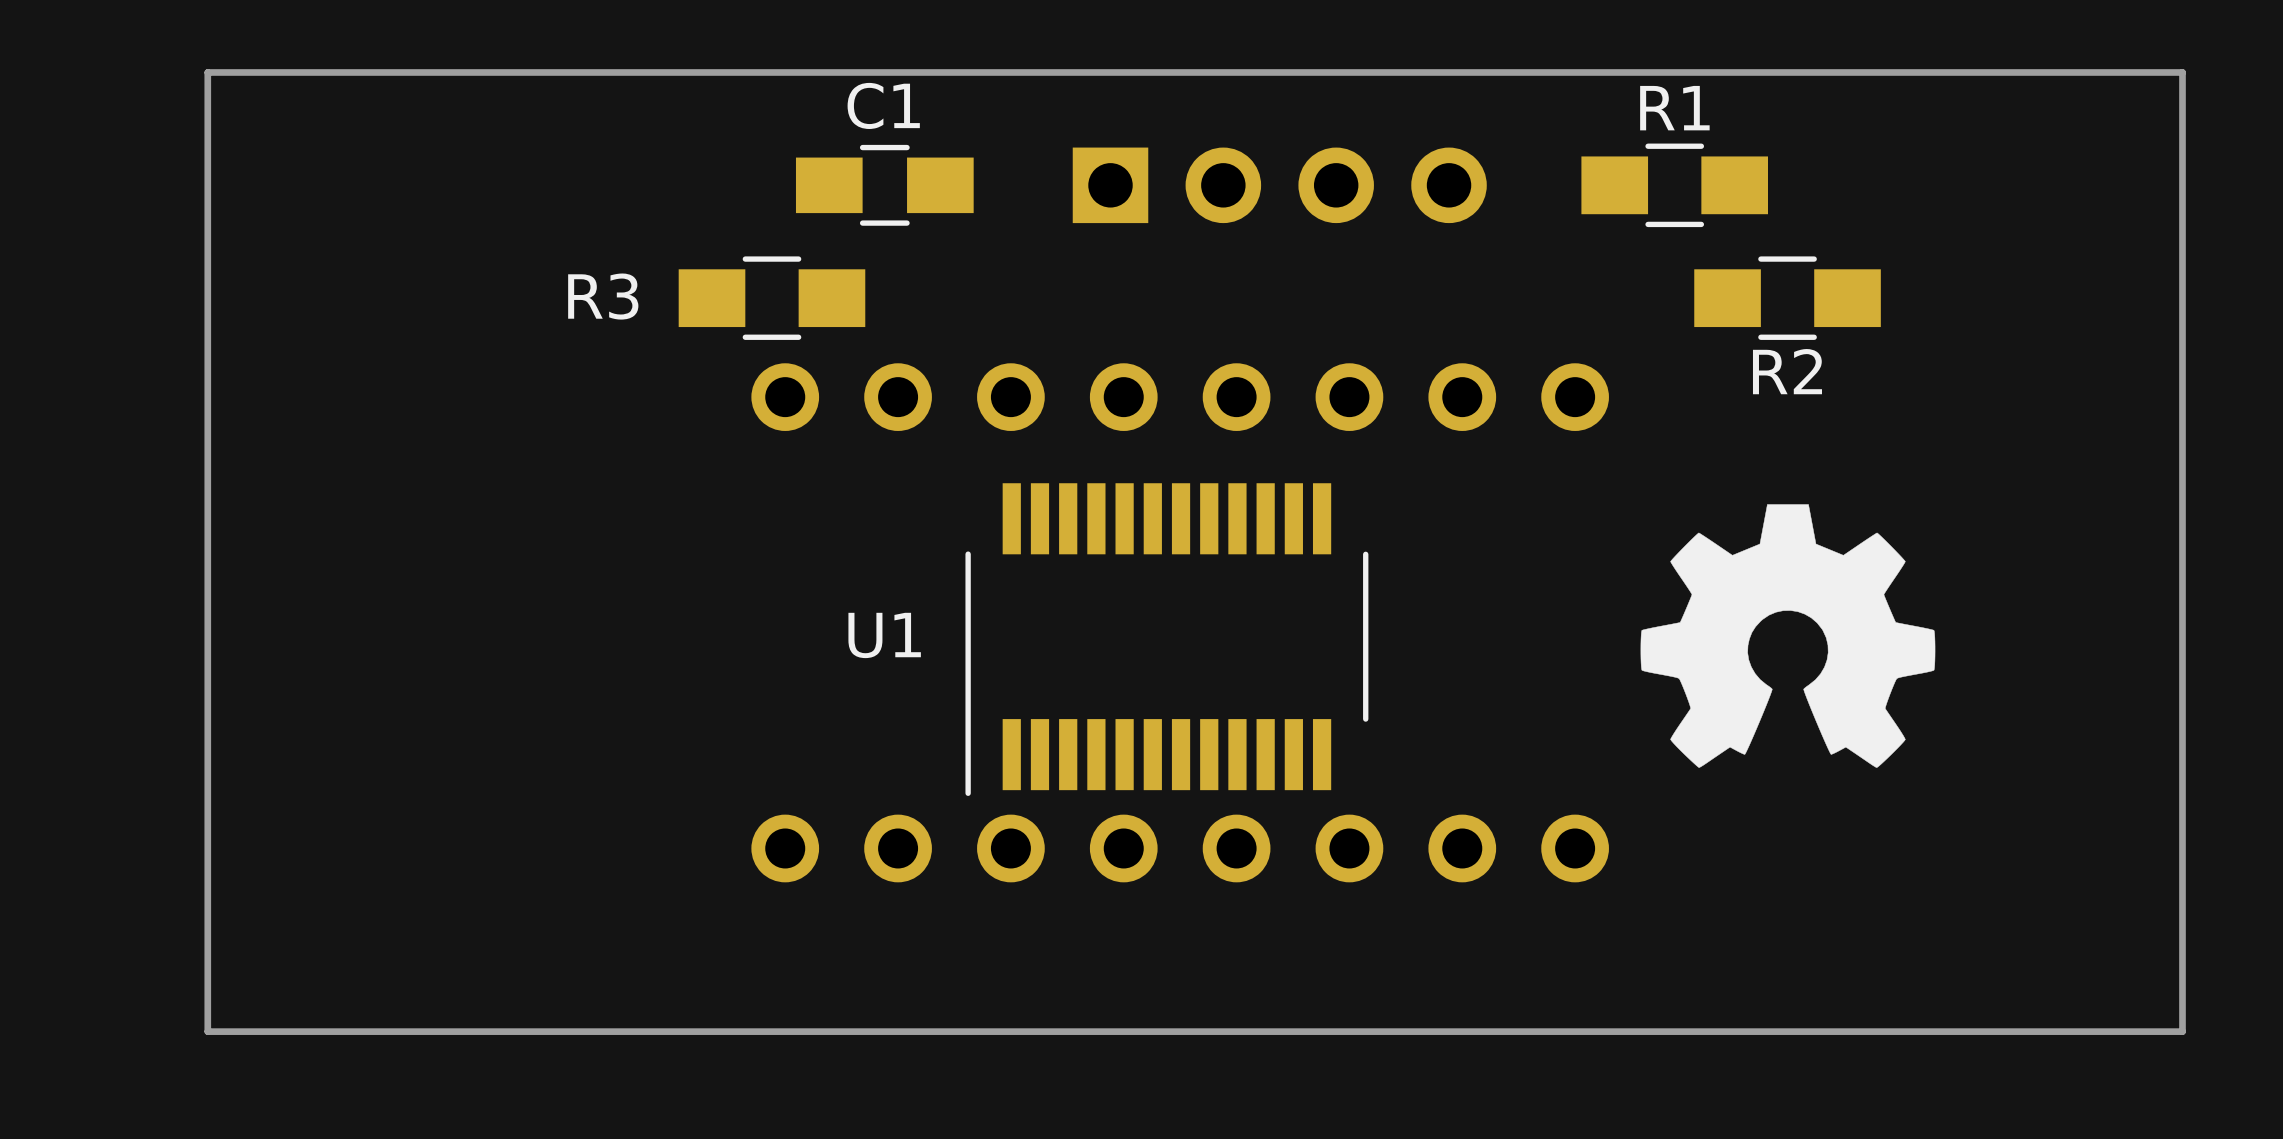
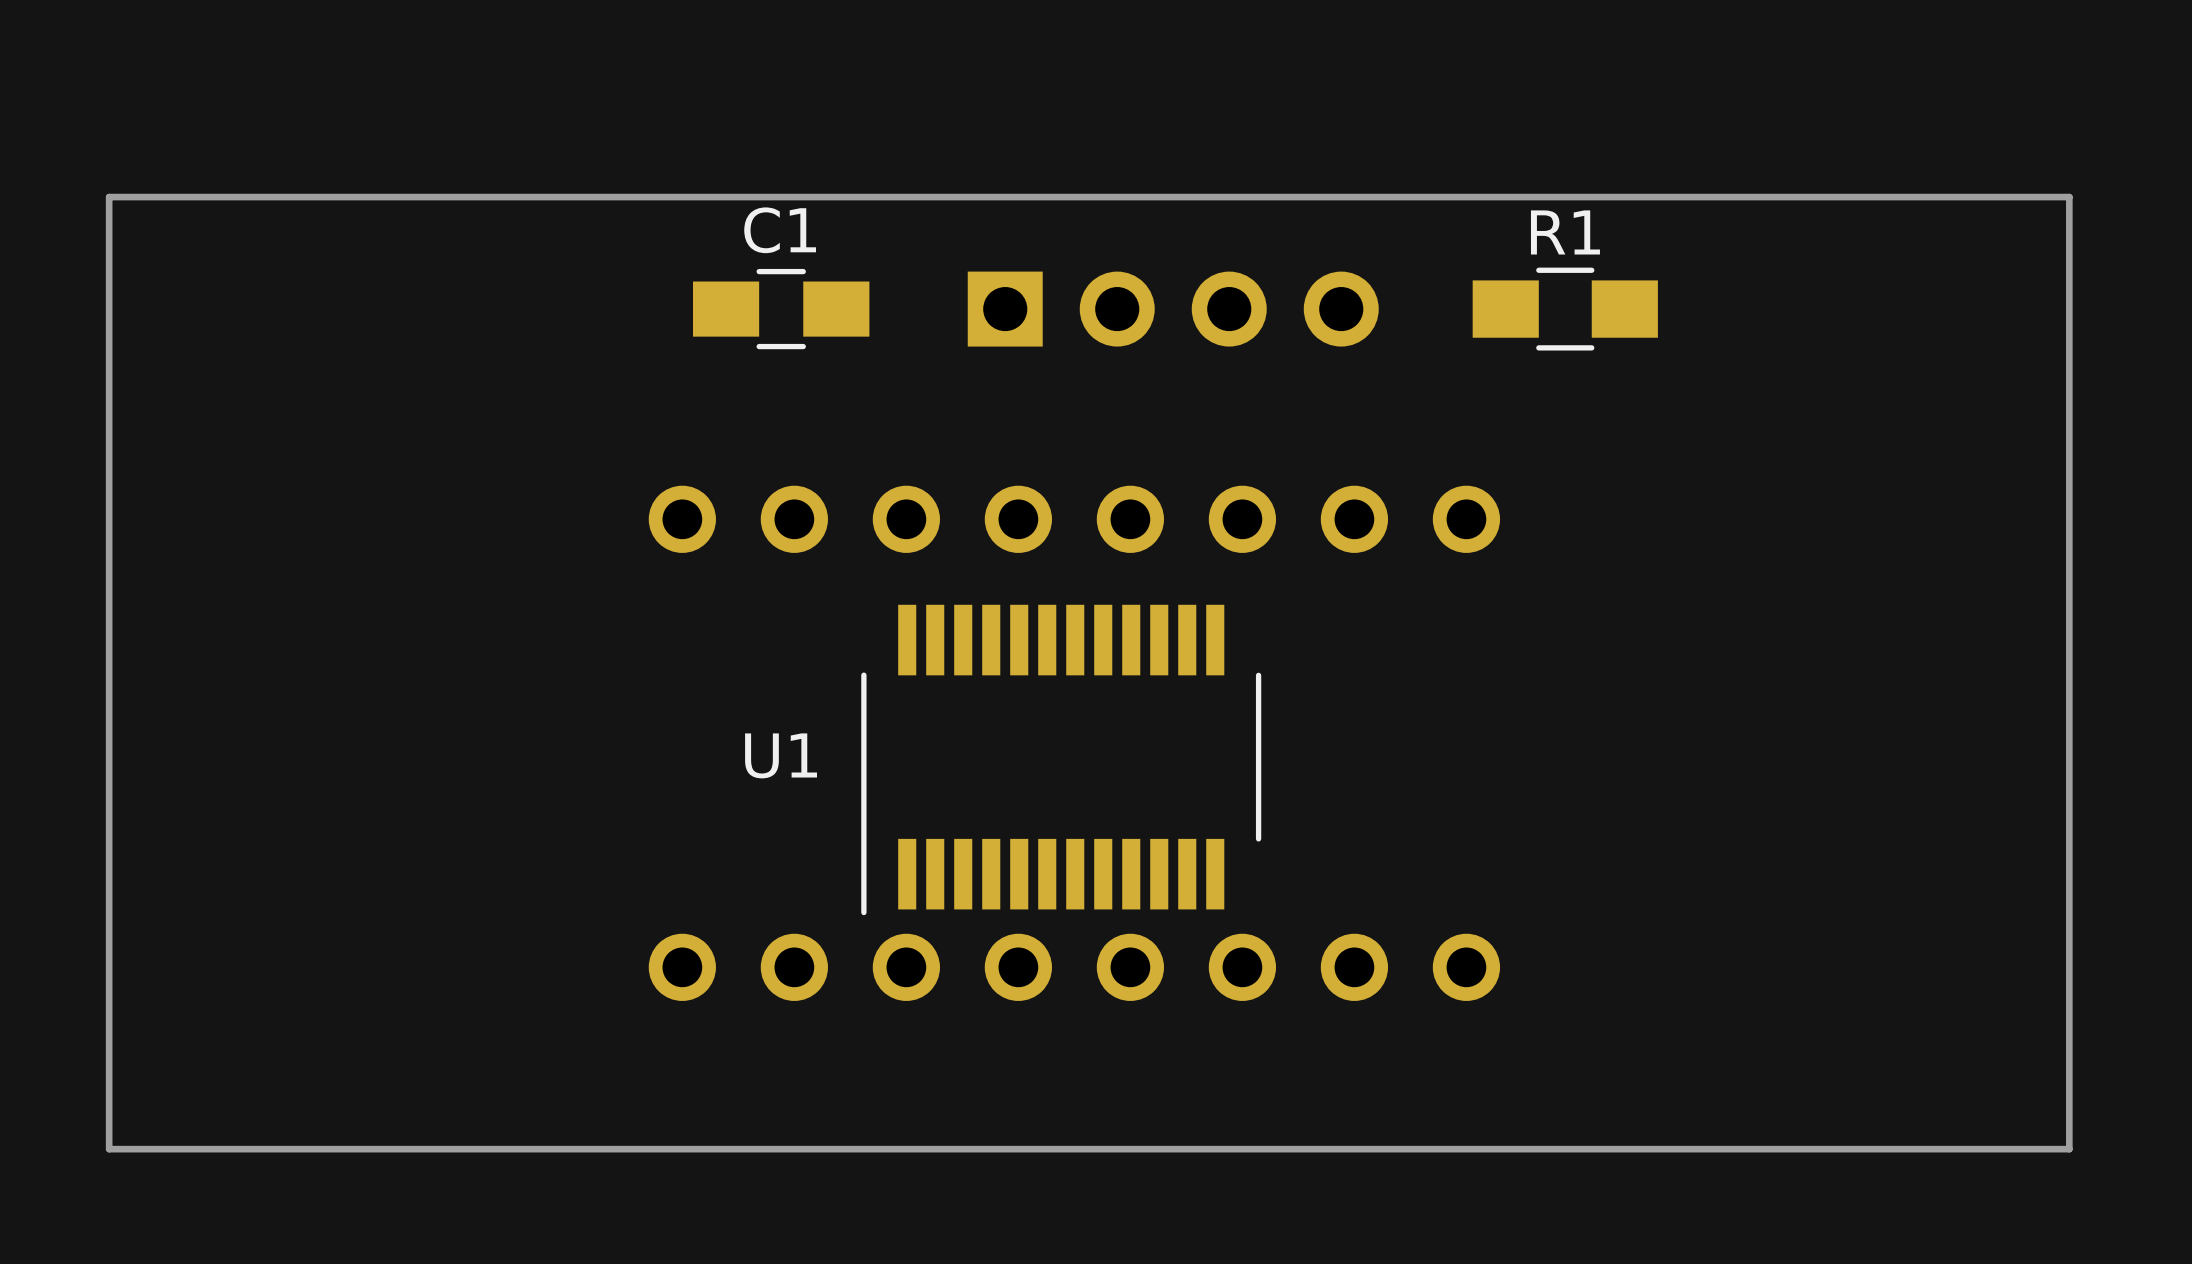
R3: (771, 298) -> none
R2: (1787, 298) -> none
drawing: [1640, 504, 1936, 768] -> none

